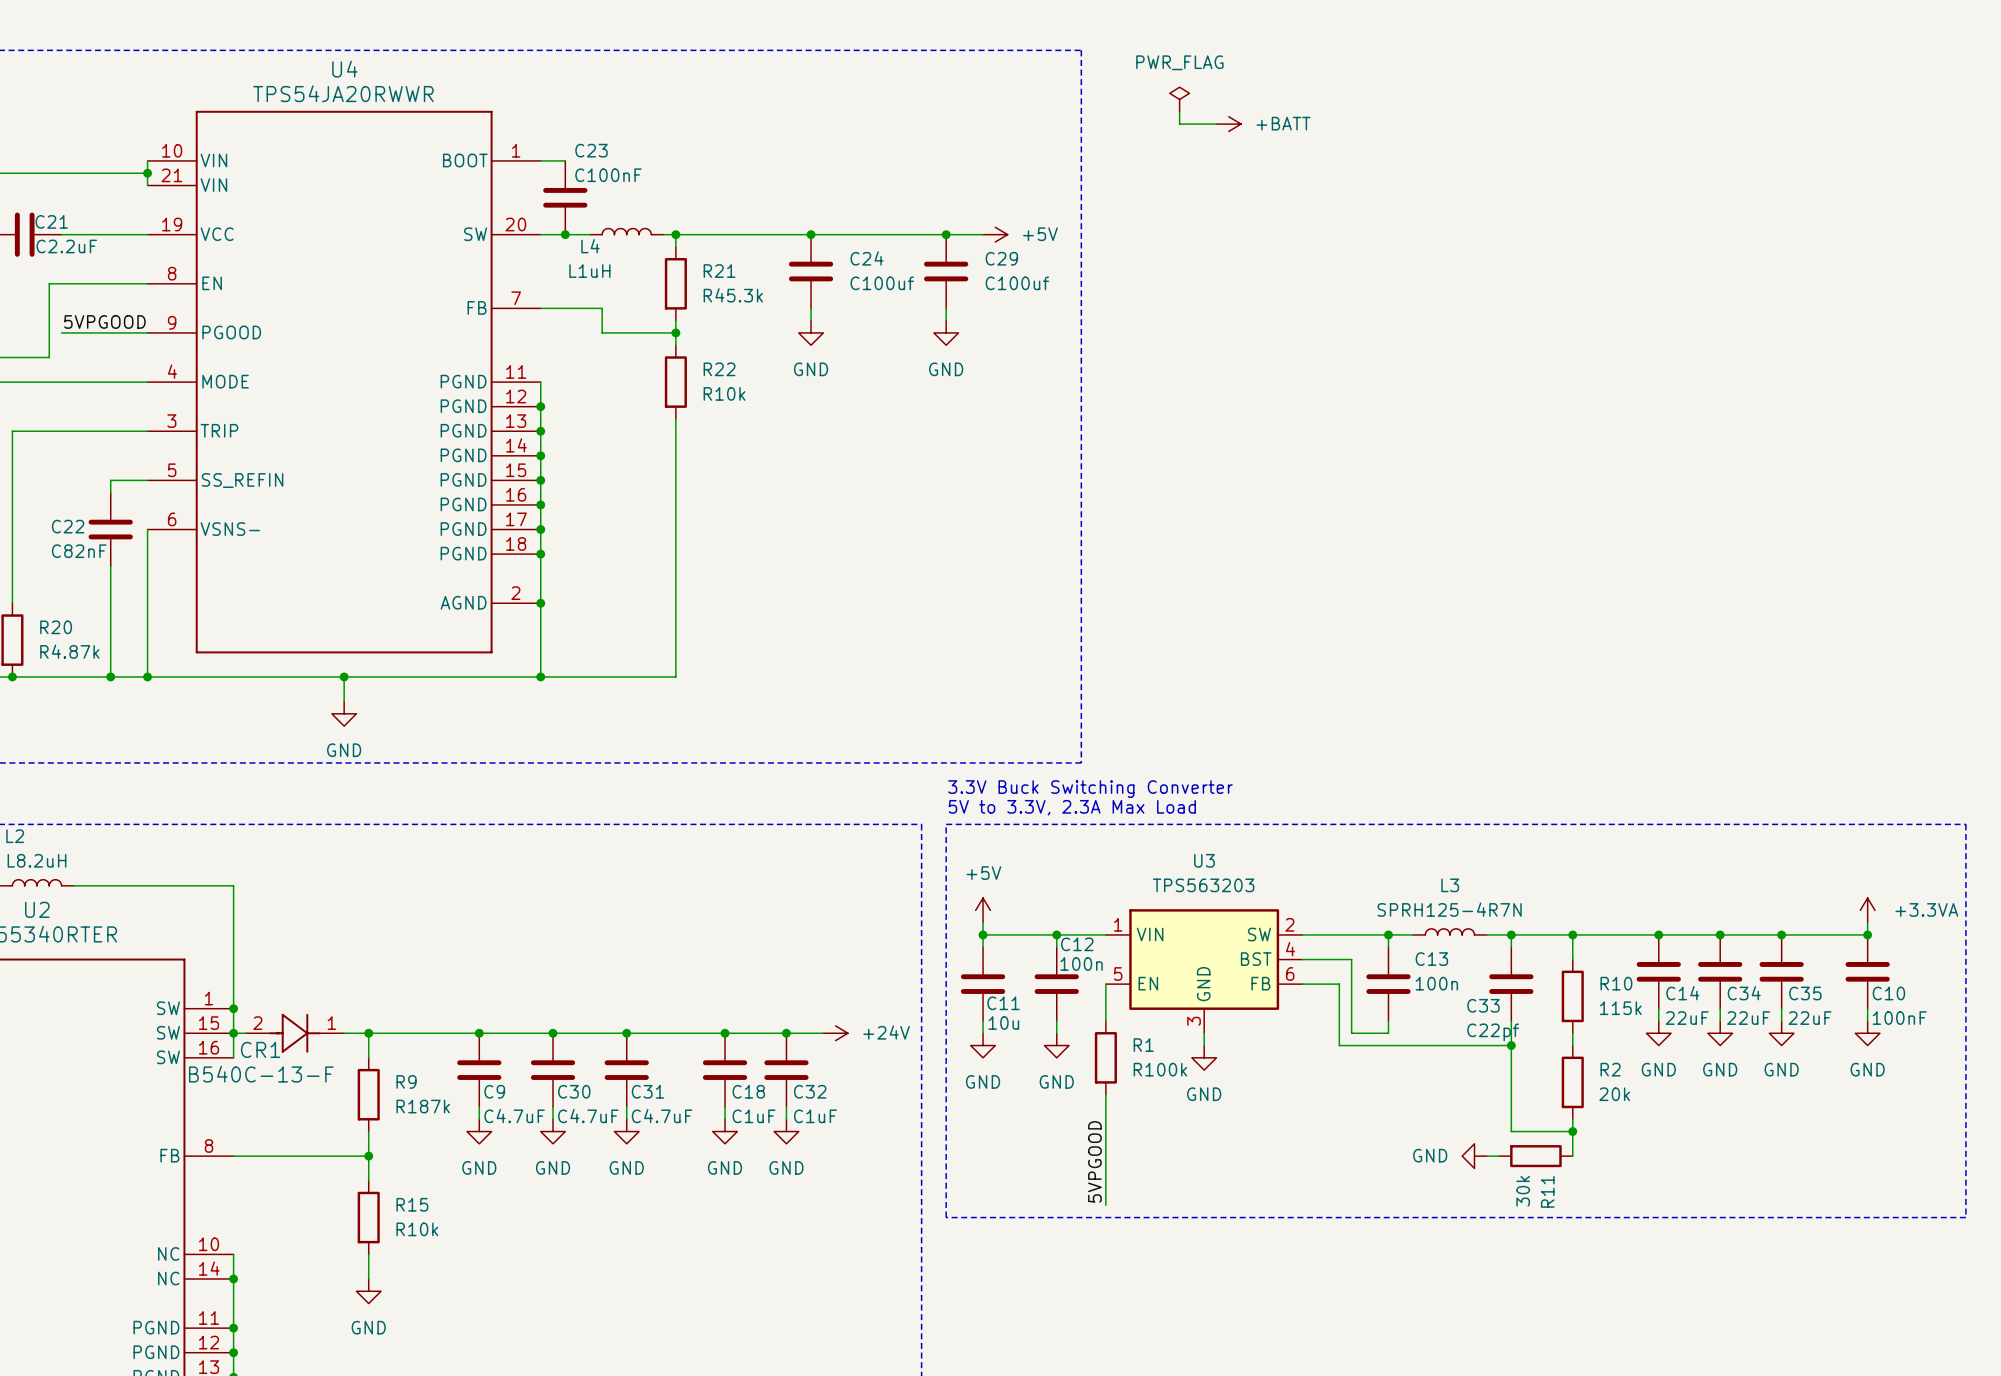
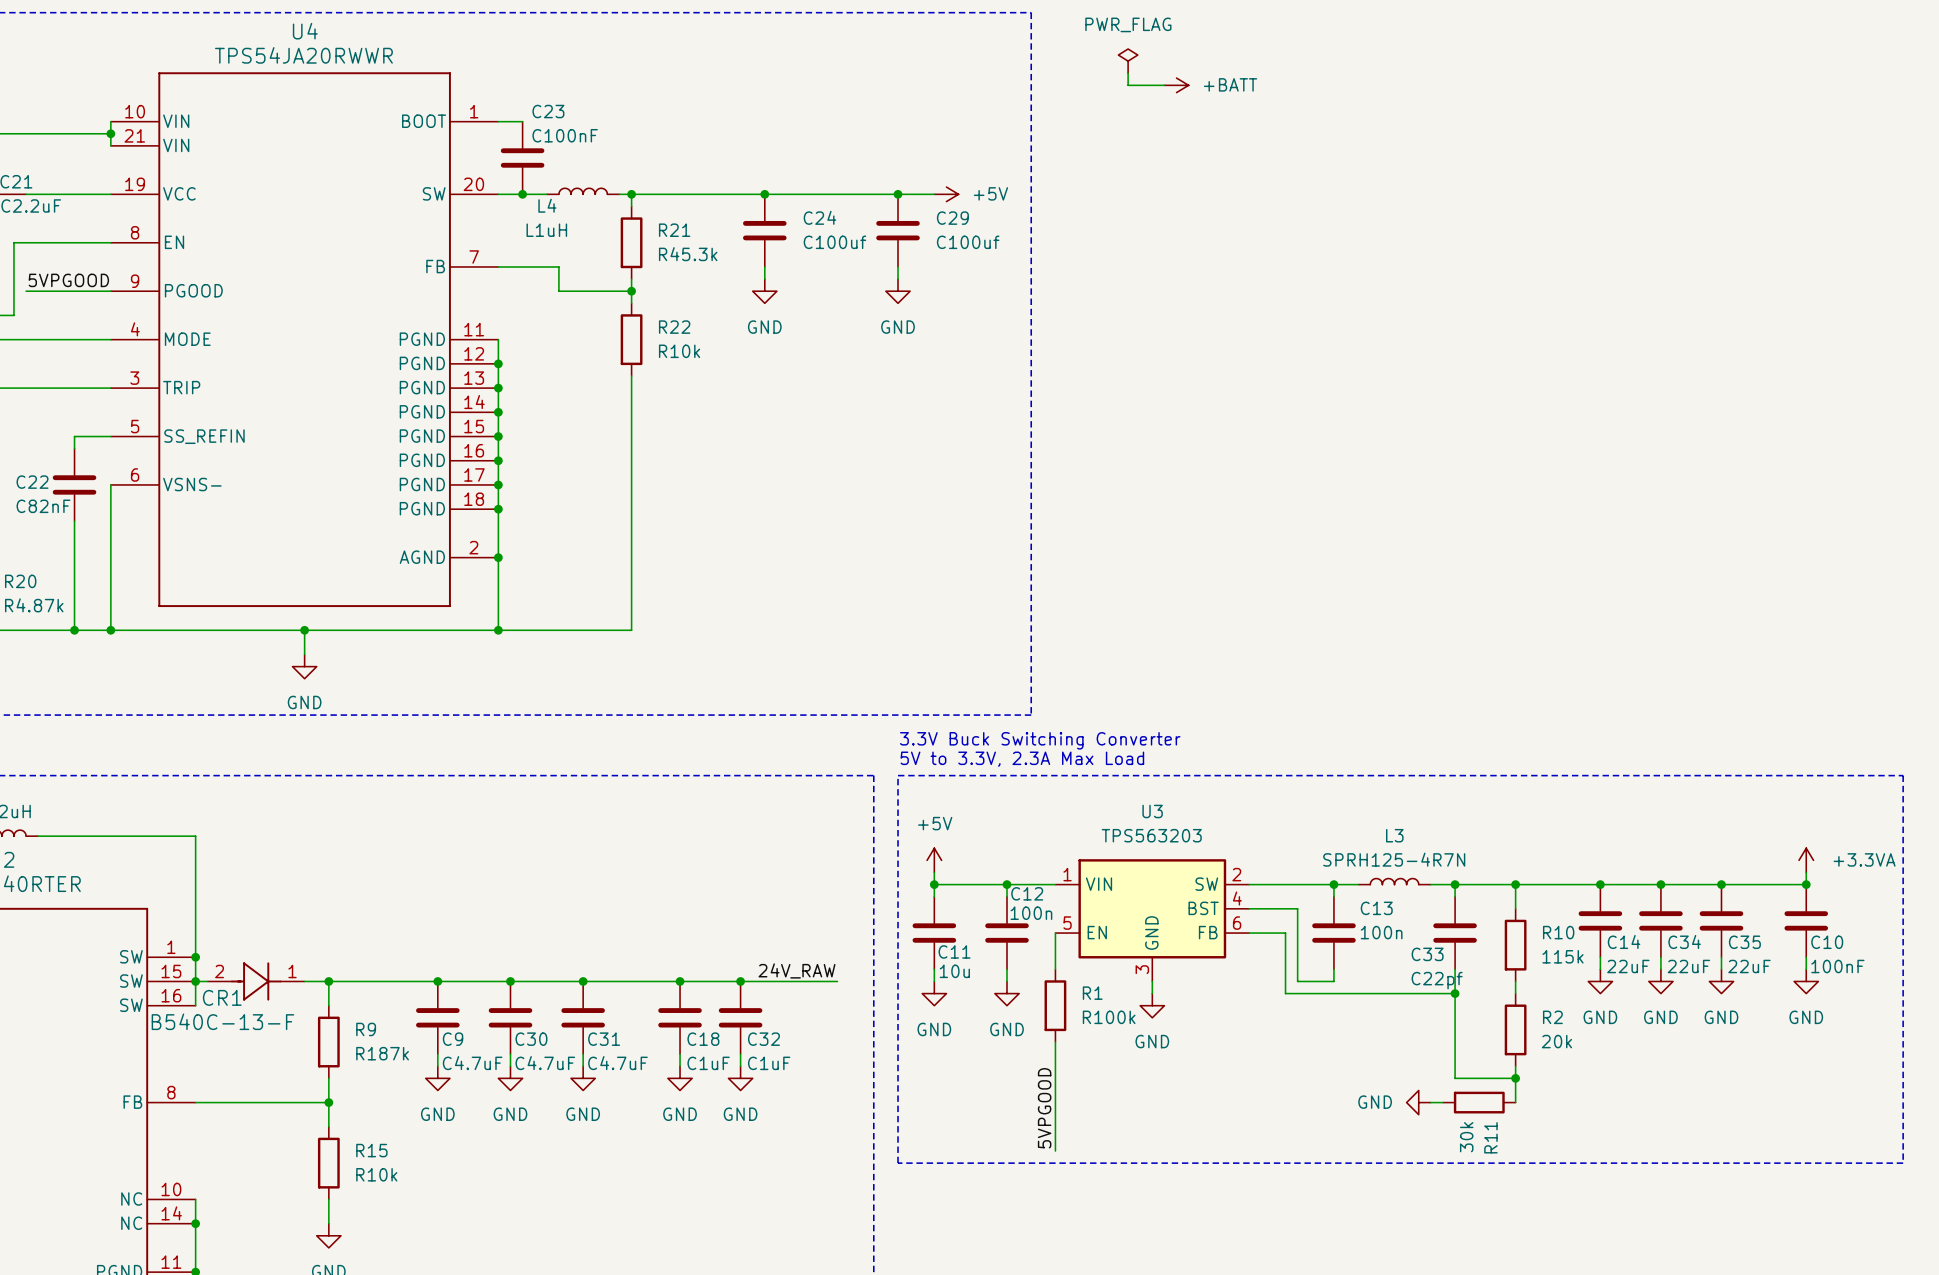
label: none -> 24V_RAW (797, 970)
wire: none -> (776, 981) (837, 981)
power symbol: +24V (835, 1033) -> none

